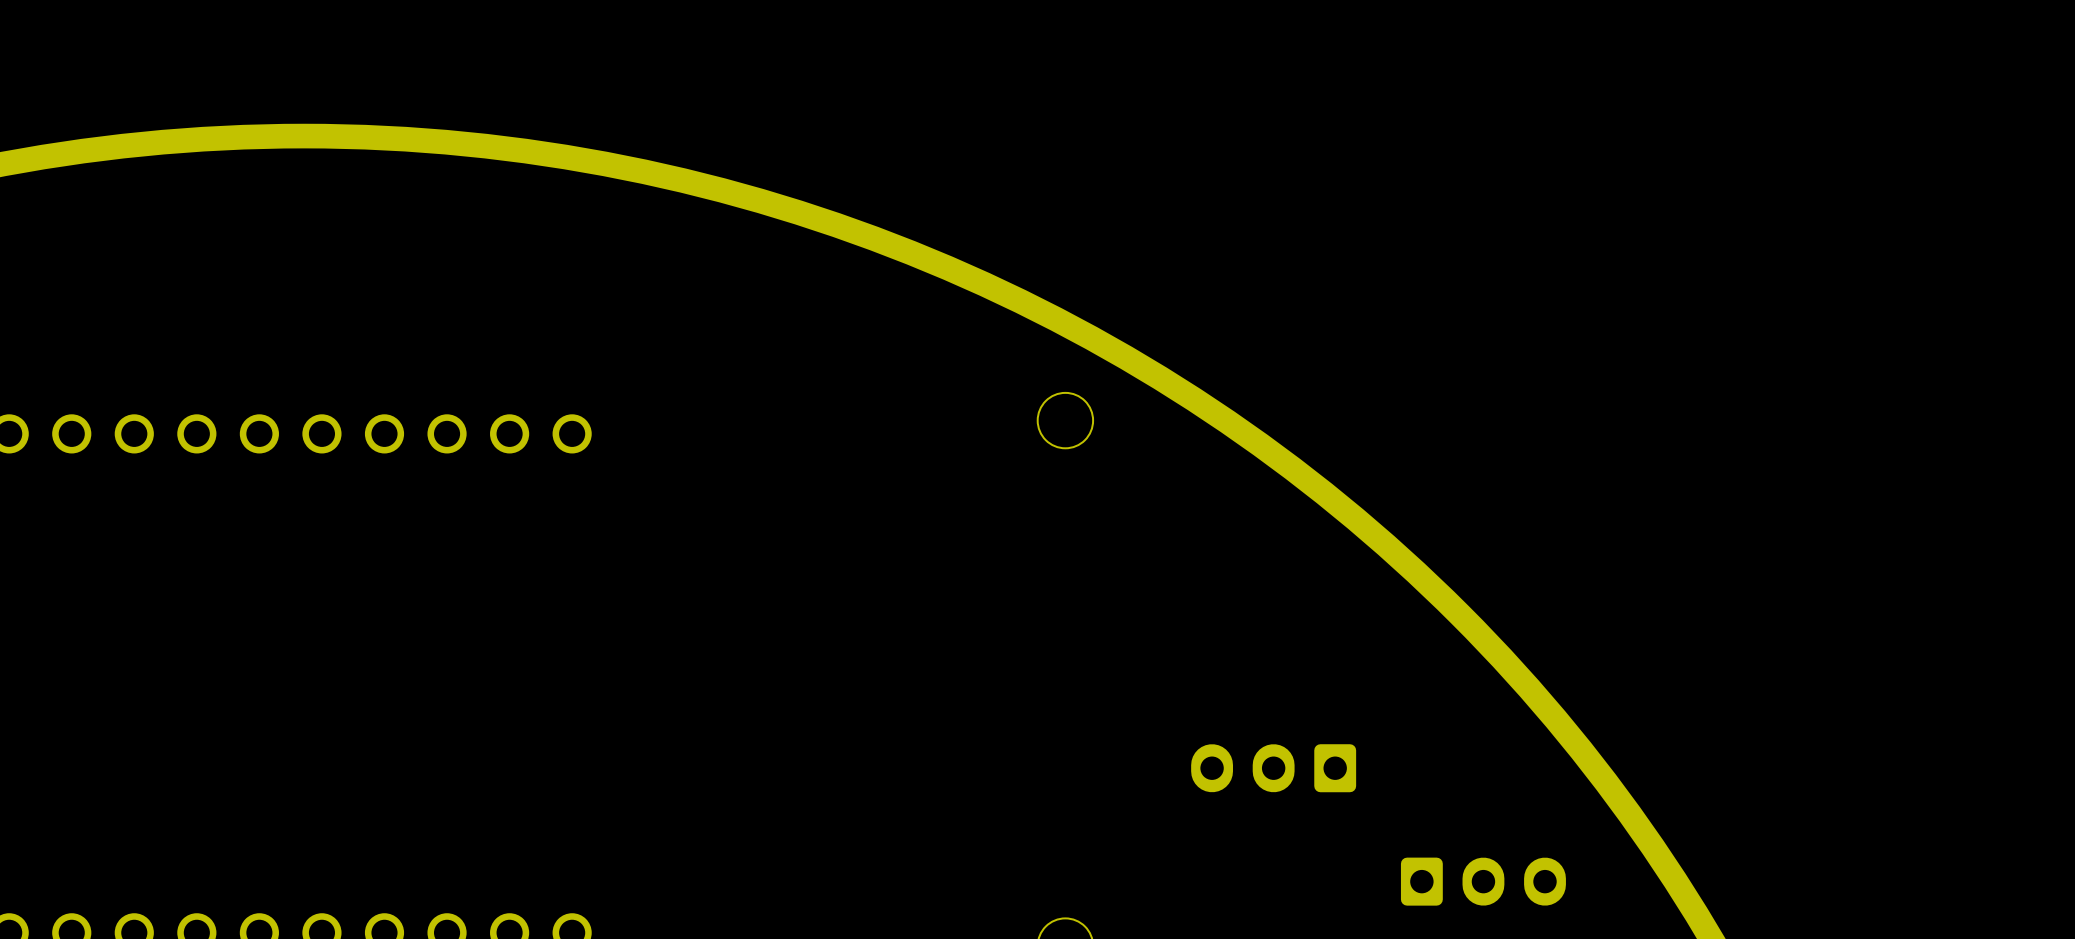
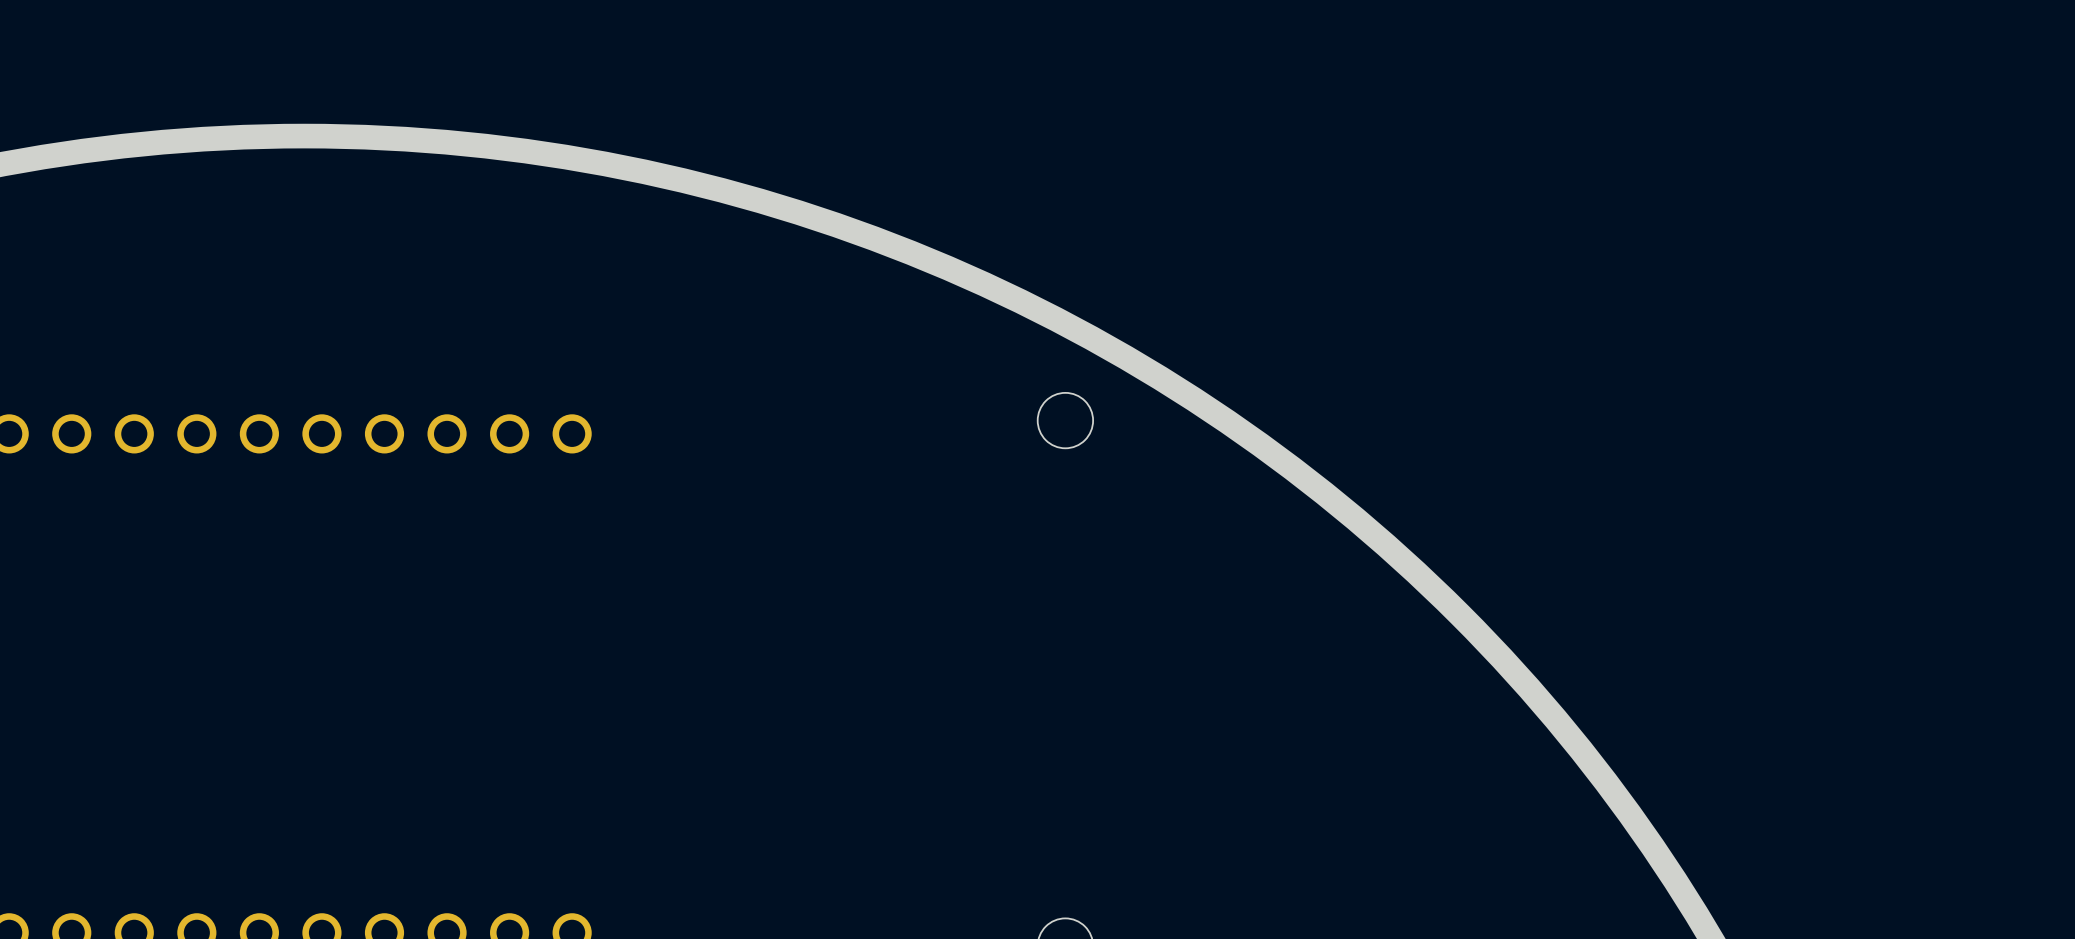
part: (1273, 768) -> none
part: (1483, 881) -> none

